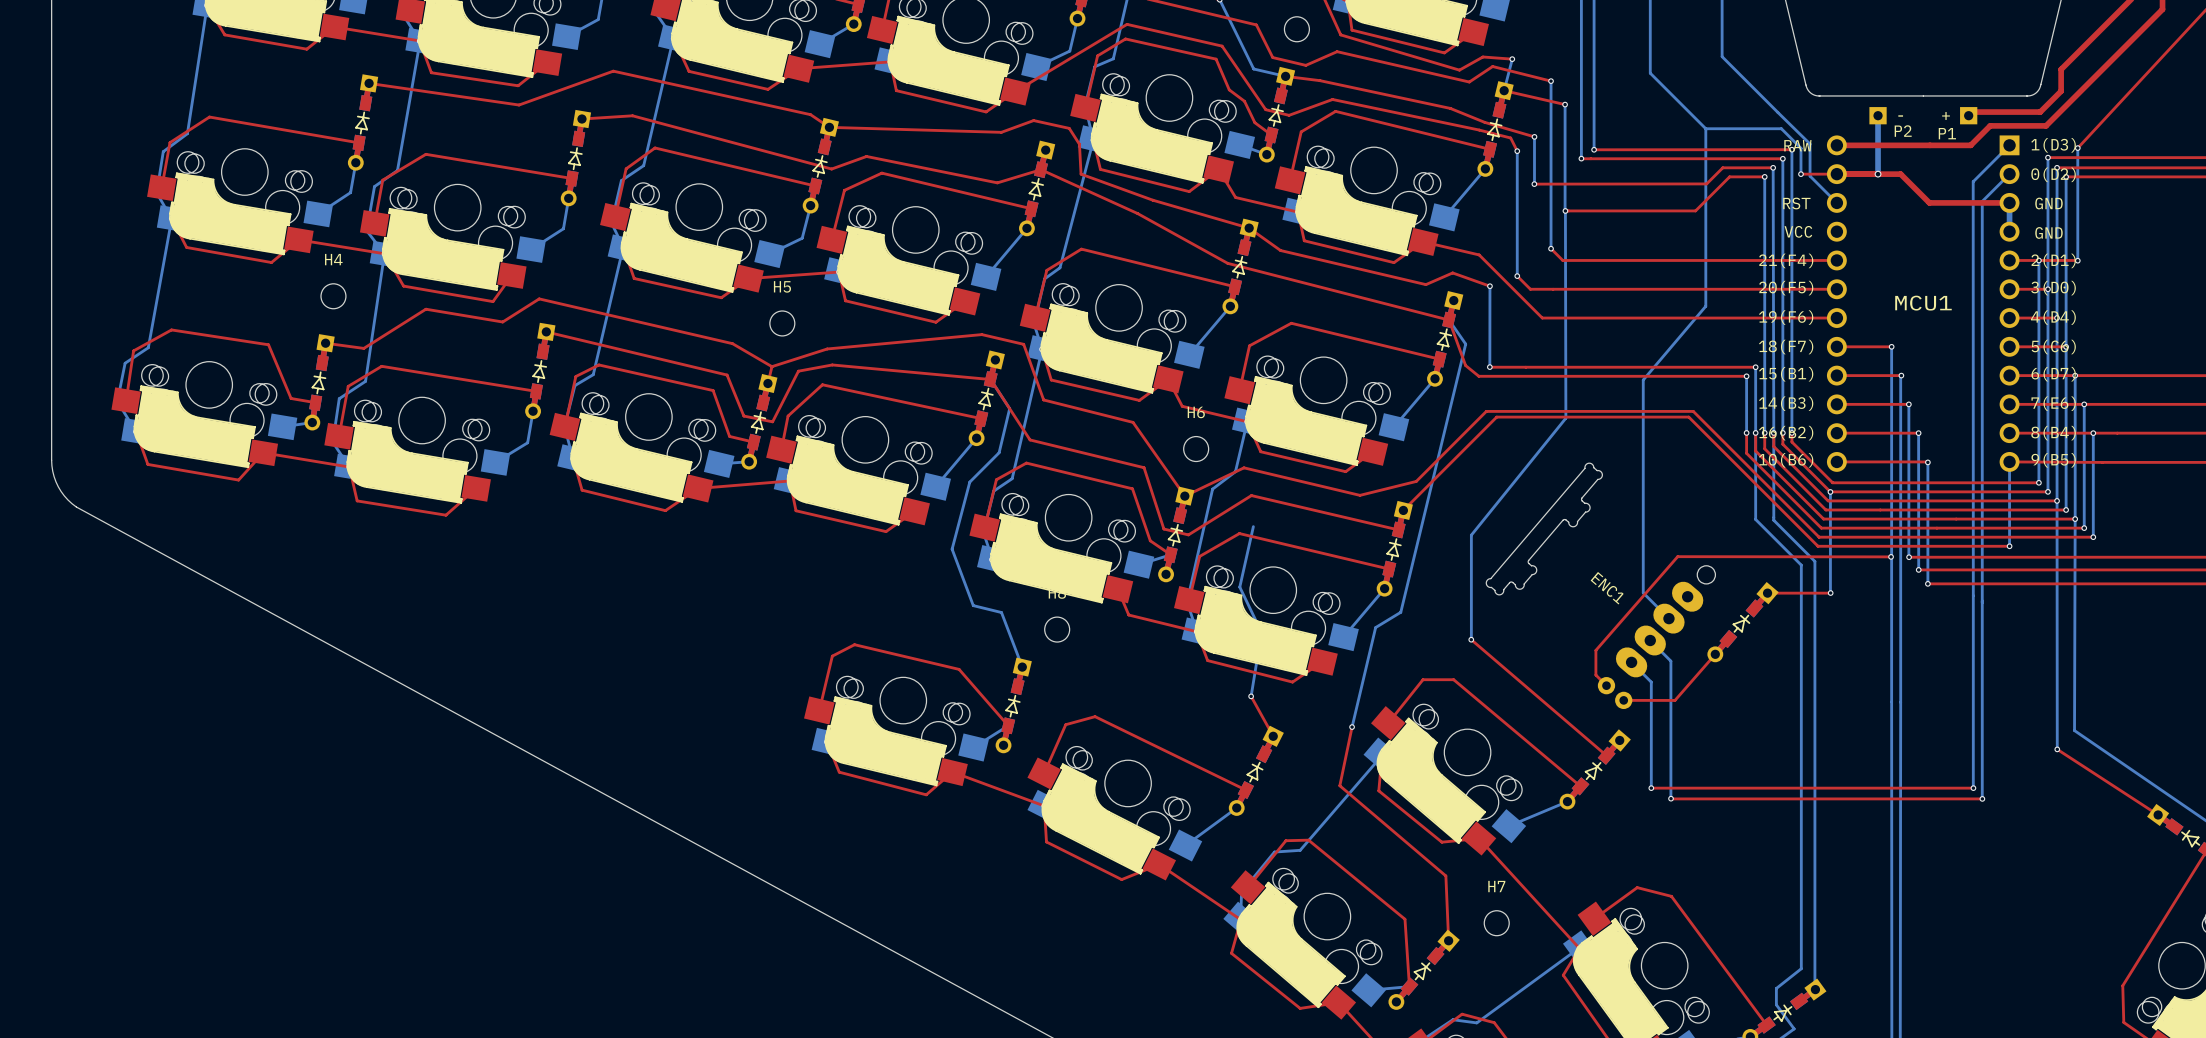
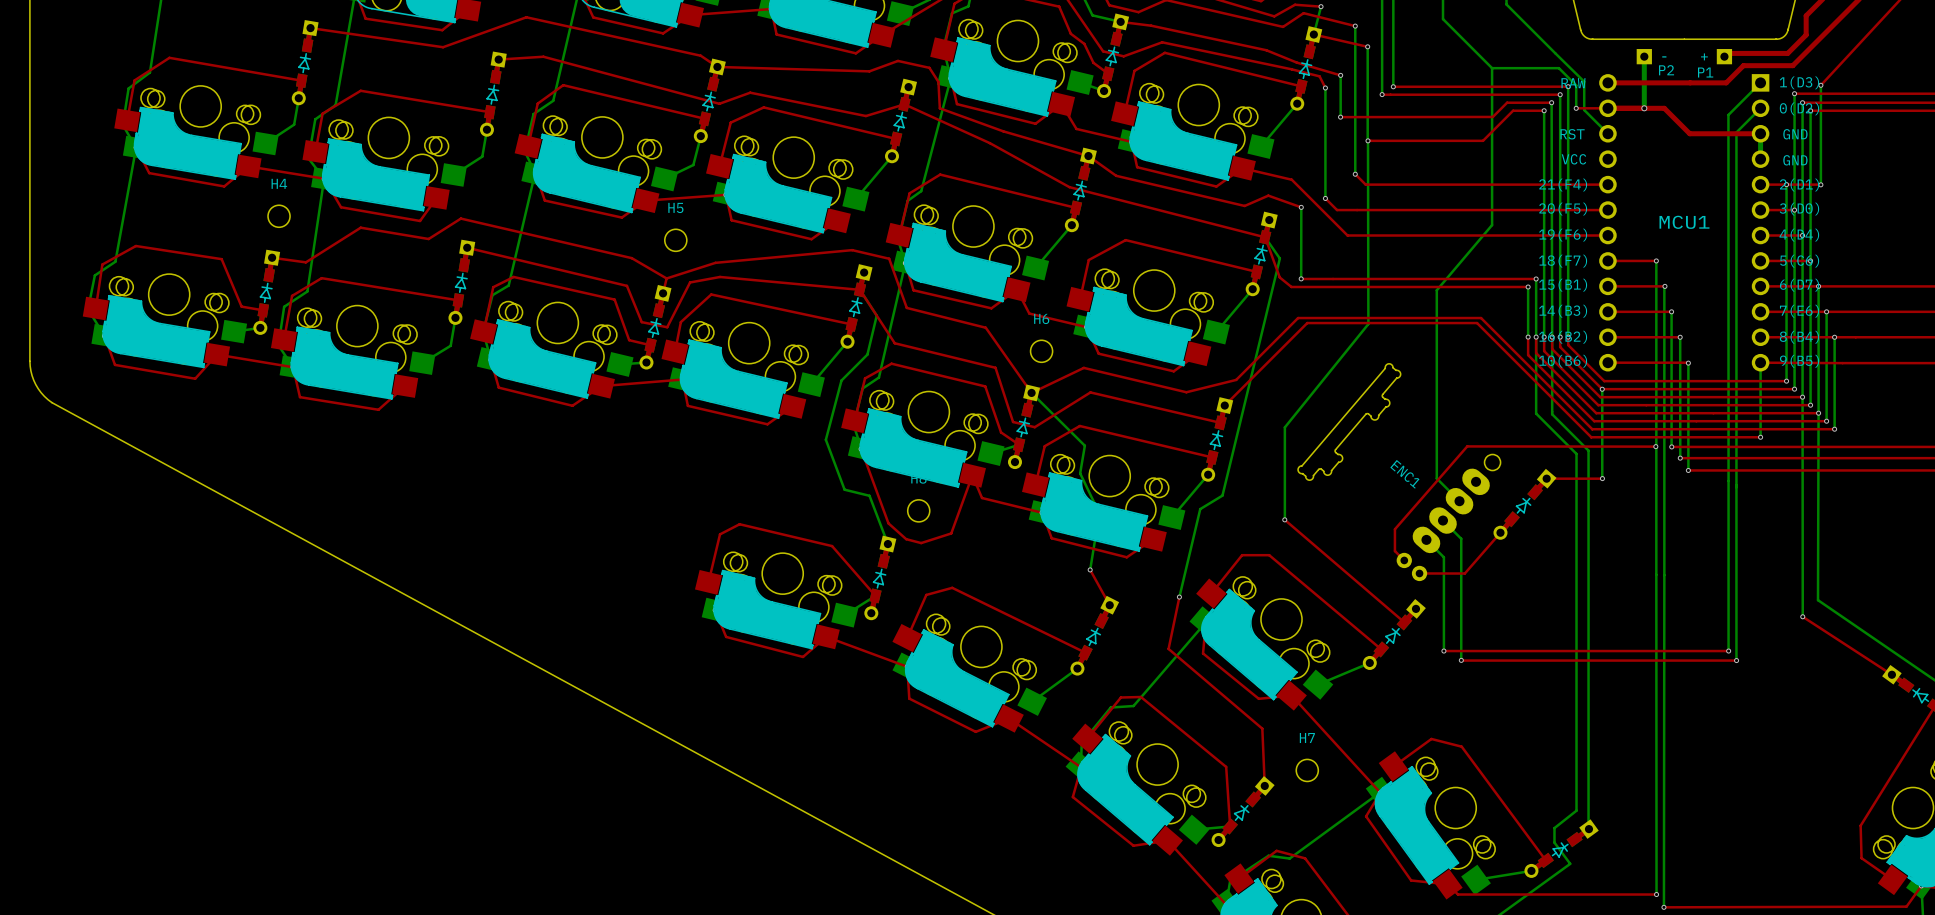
bottom track: (1247, 421) (1235, 471) (1212, 489) (1187, 601) (1196, 631) -> none
bottom track: (1253, 526) (1239, 587) -> (1031, 392) (1084, 445) (1080, 473)
top track: none -> (861, 449) (888, 523) (906, 539) (921, 543) (951, 533) (972, 475)

